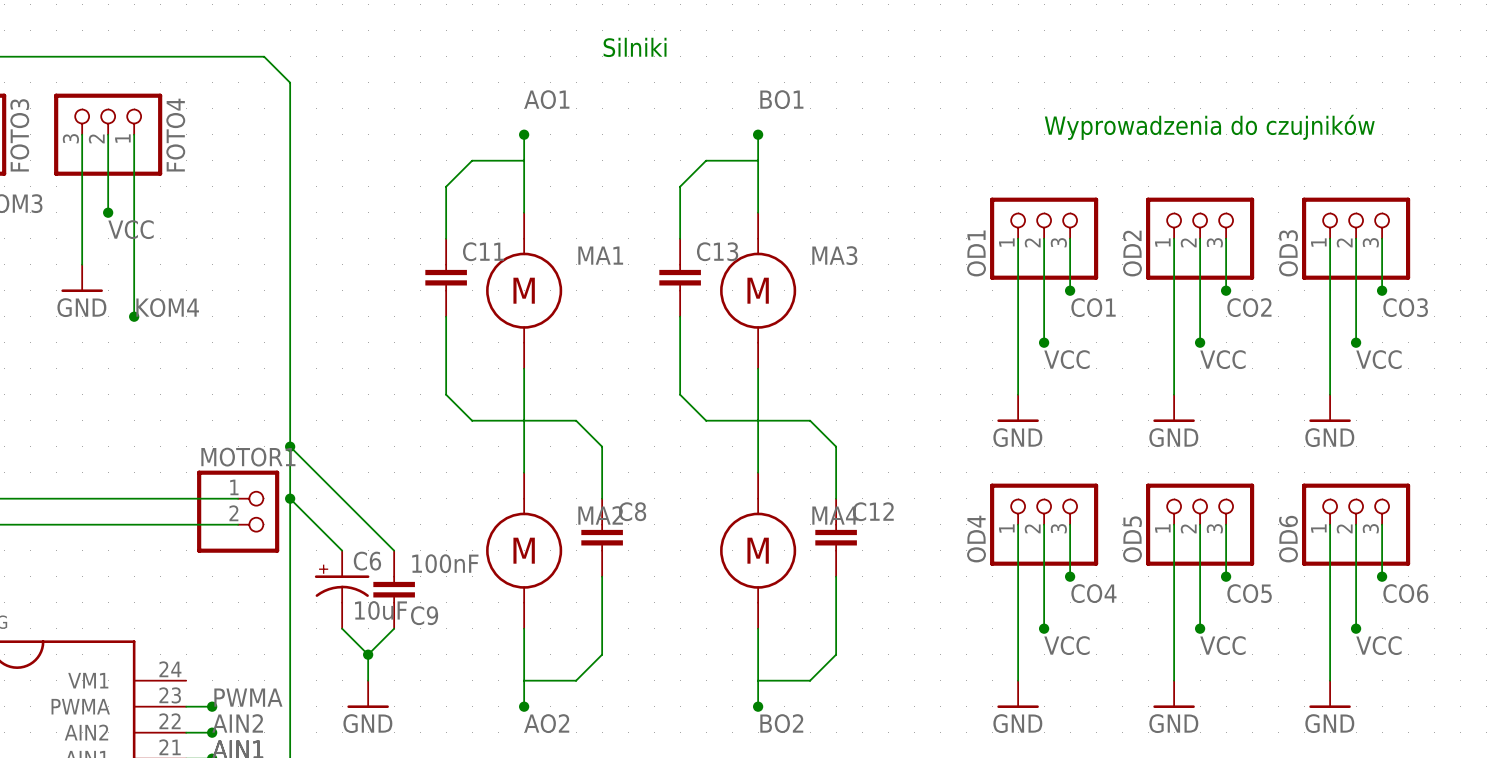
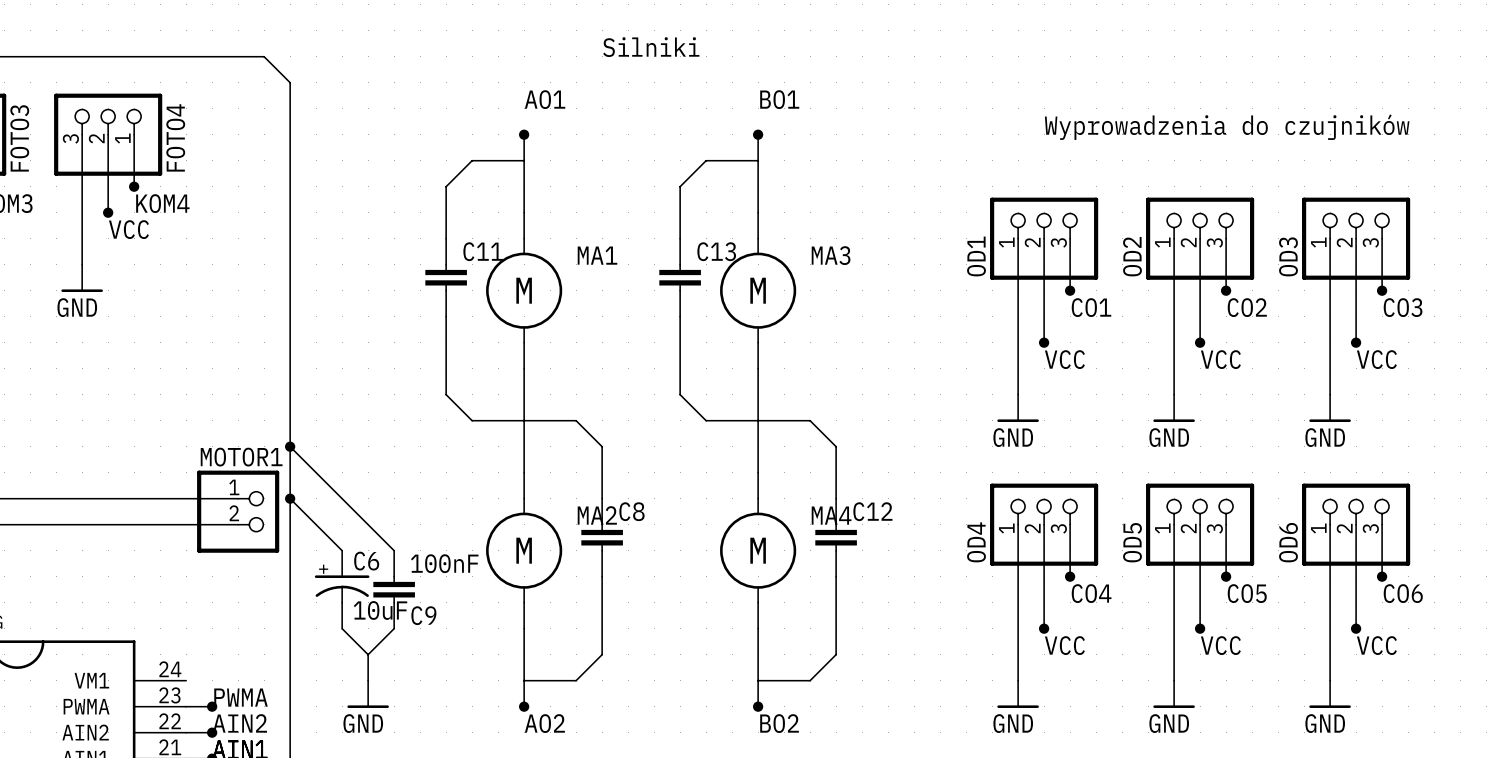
wire: (134, 186) (134, 316) -> none
junction: none -> (134, 186)
label position: KOM4 (167, 307) -> KOM4 (162, 203)
junction: (134, 316) -> none
junction: (368, 654) -> none

